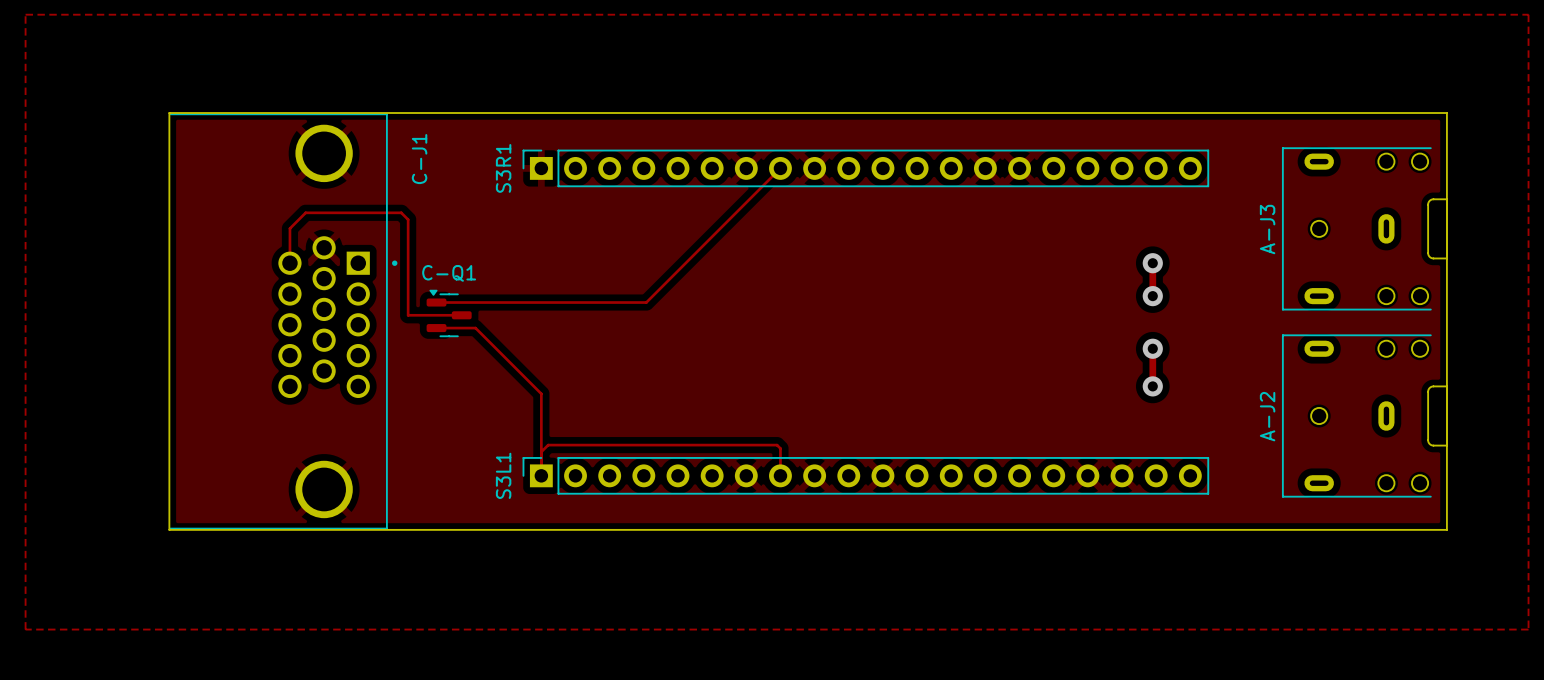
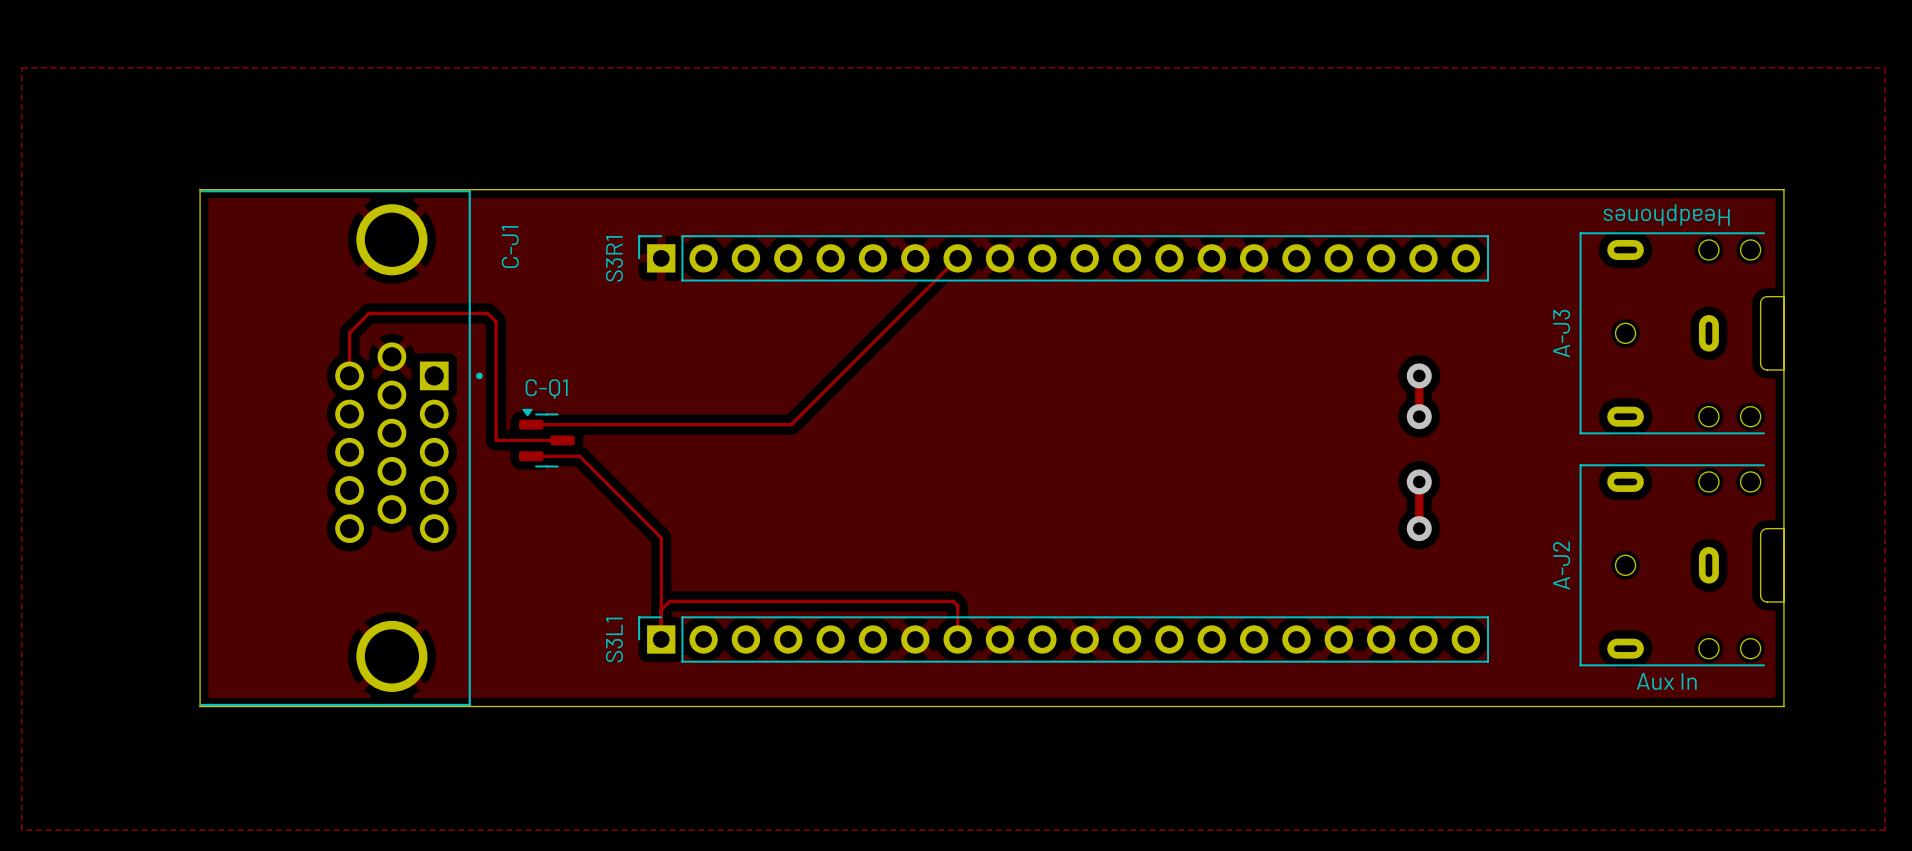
A-J3 value: none -> Headphones (1666, 214)
A-J2 value: none -> Aux In (1666, 681)

